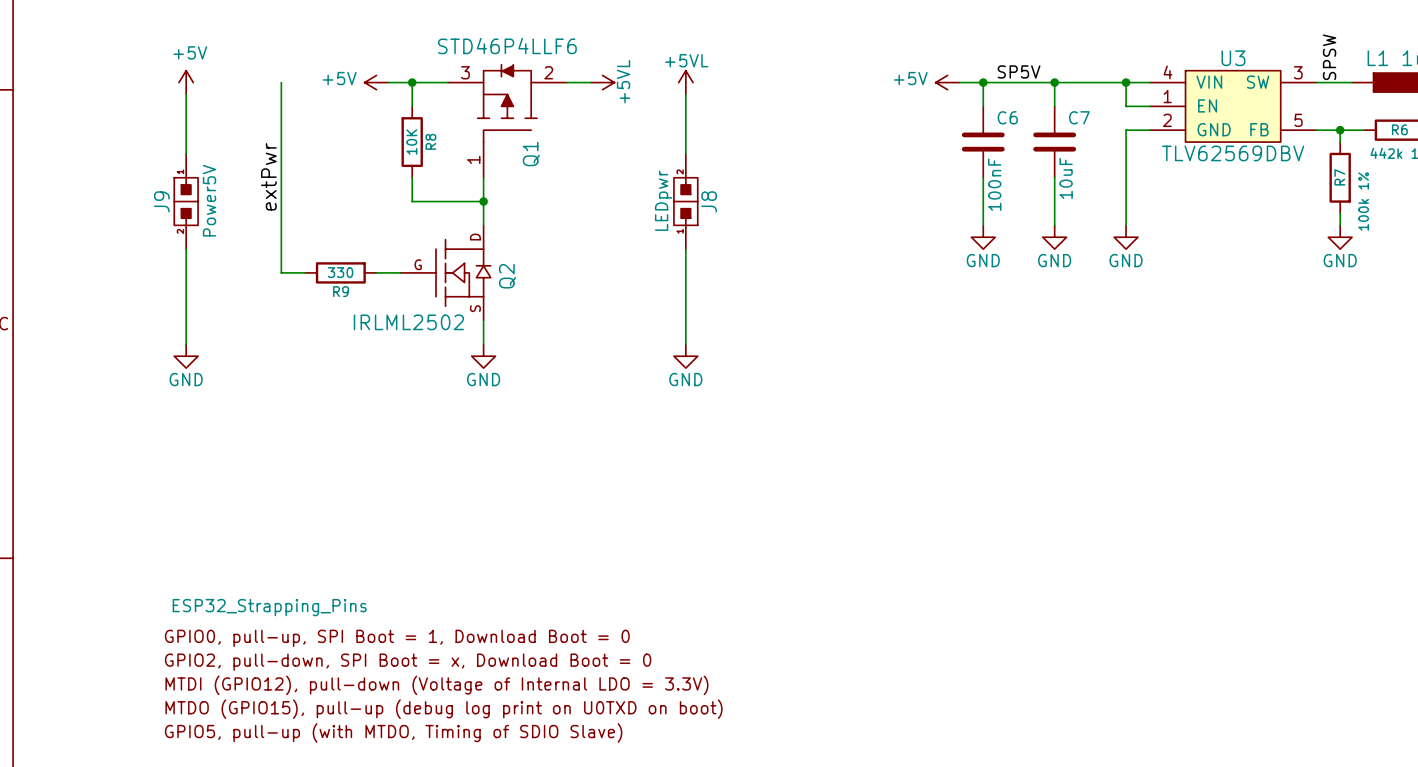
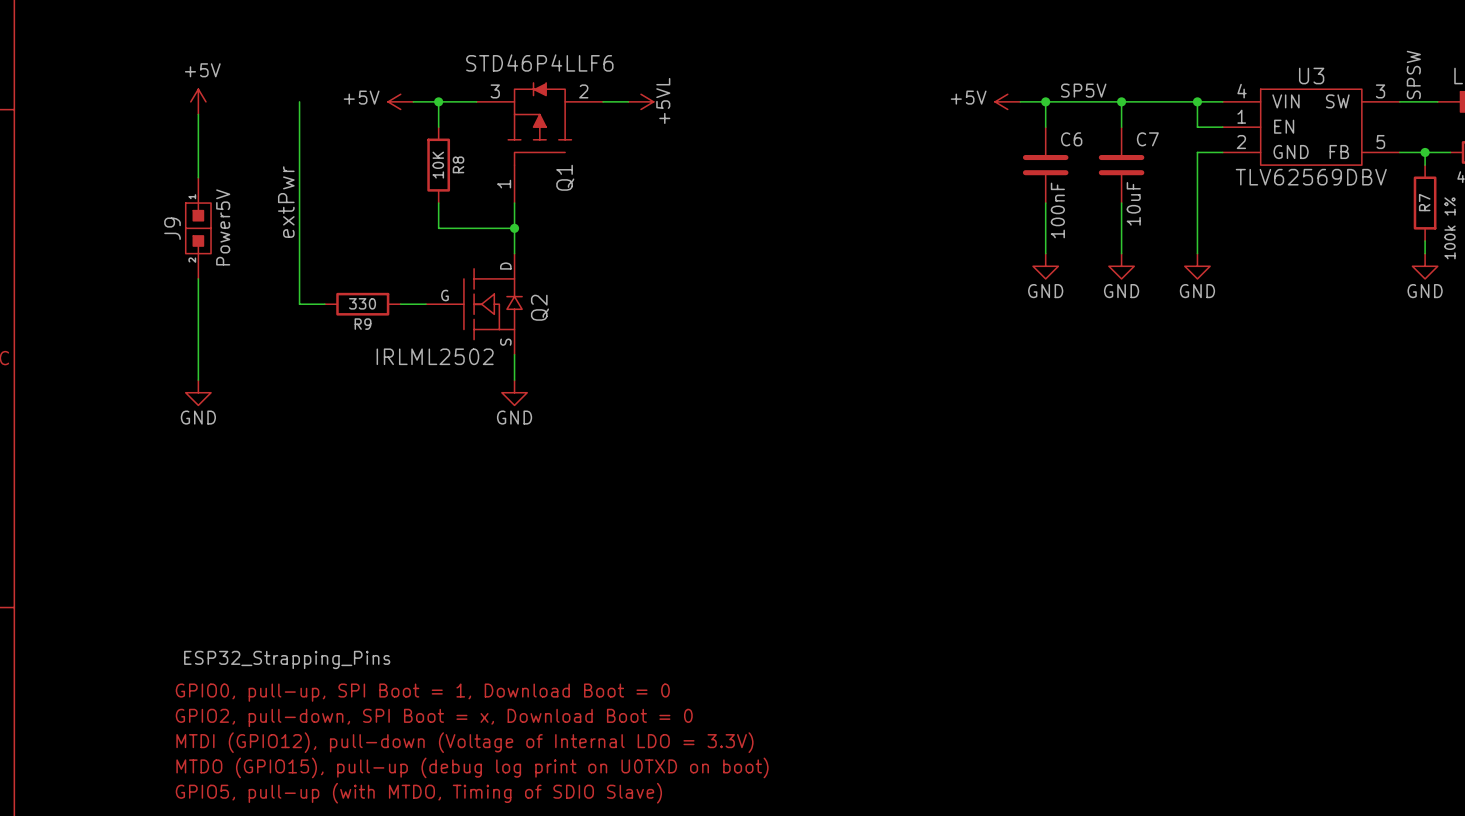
power symbol: +5VL (685, 82) -> none
wire: (685, 94) (685, 153) -> none
J8: LEDpwr (685, 201) -> none
wire: (685, 249) (685, 344) -> none
power symbol: GND (685, 356) -> none

